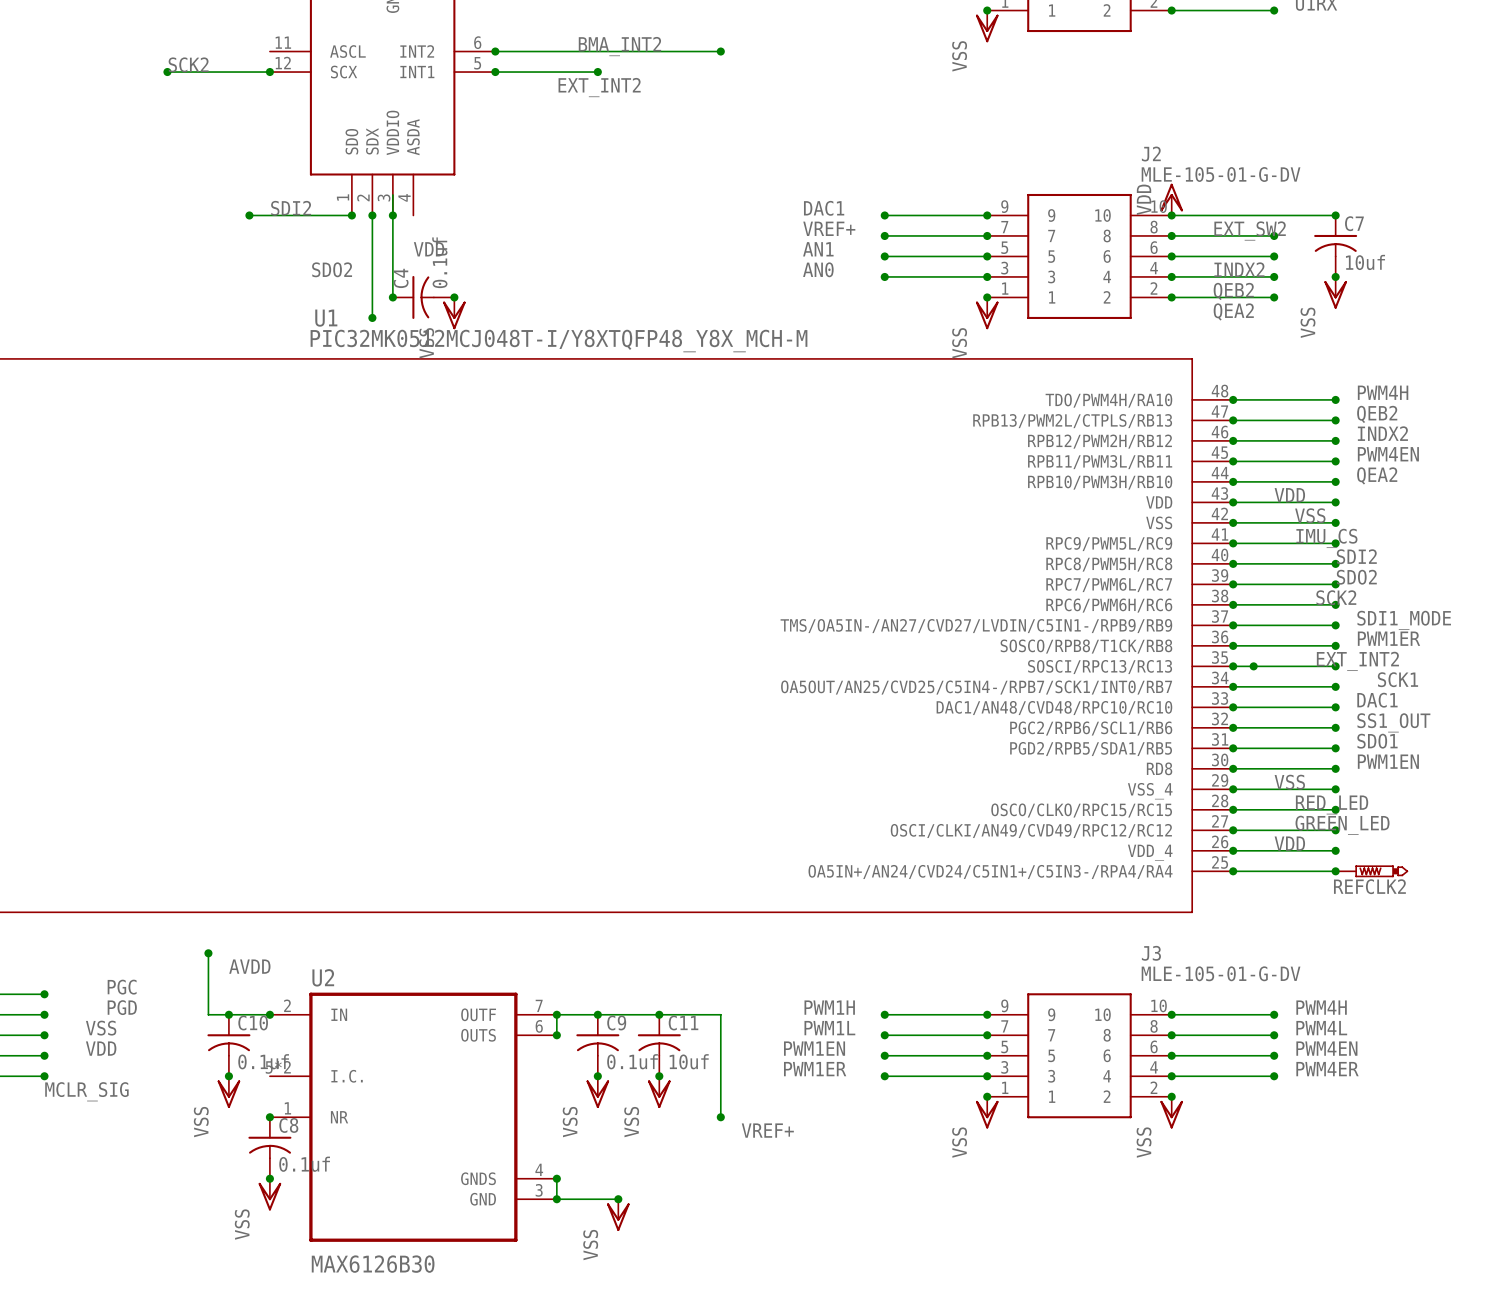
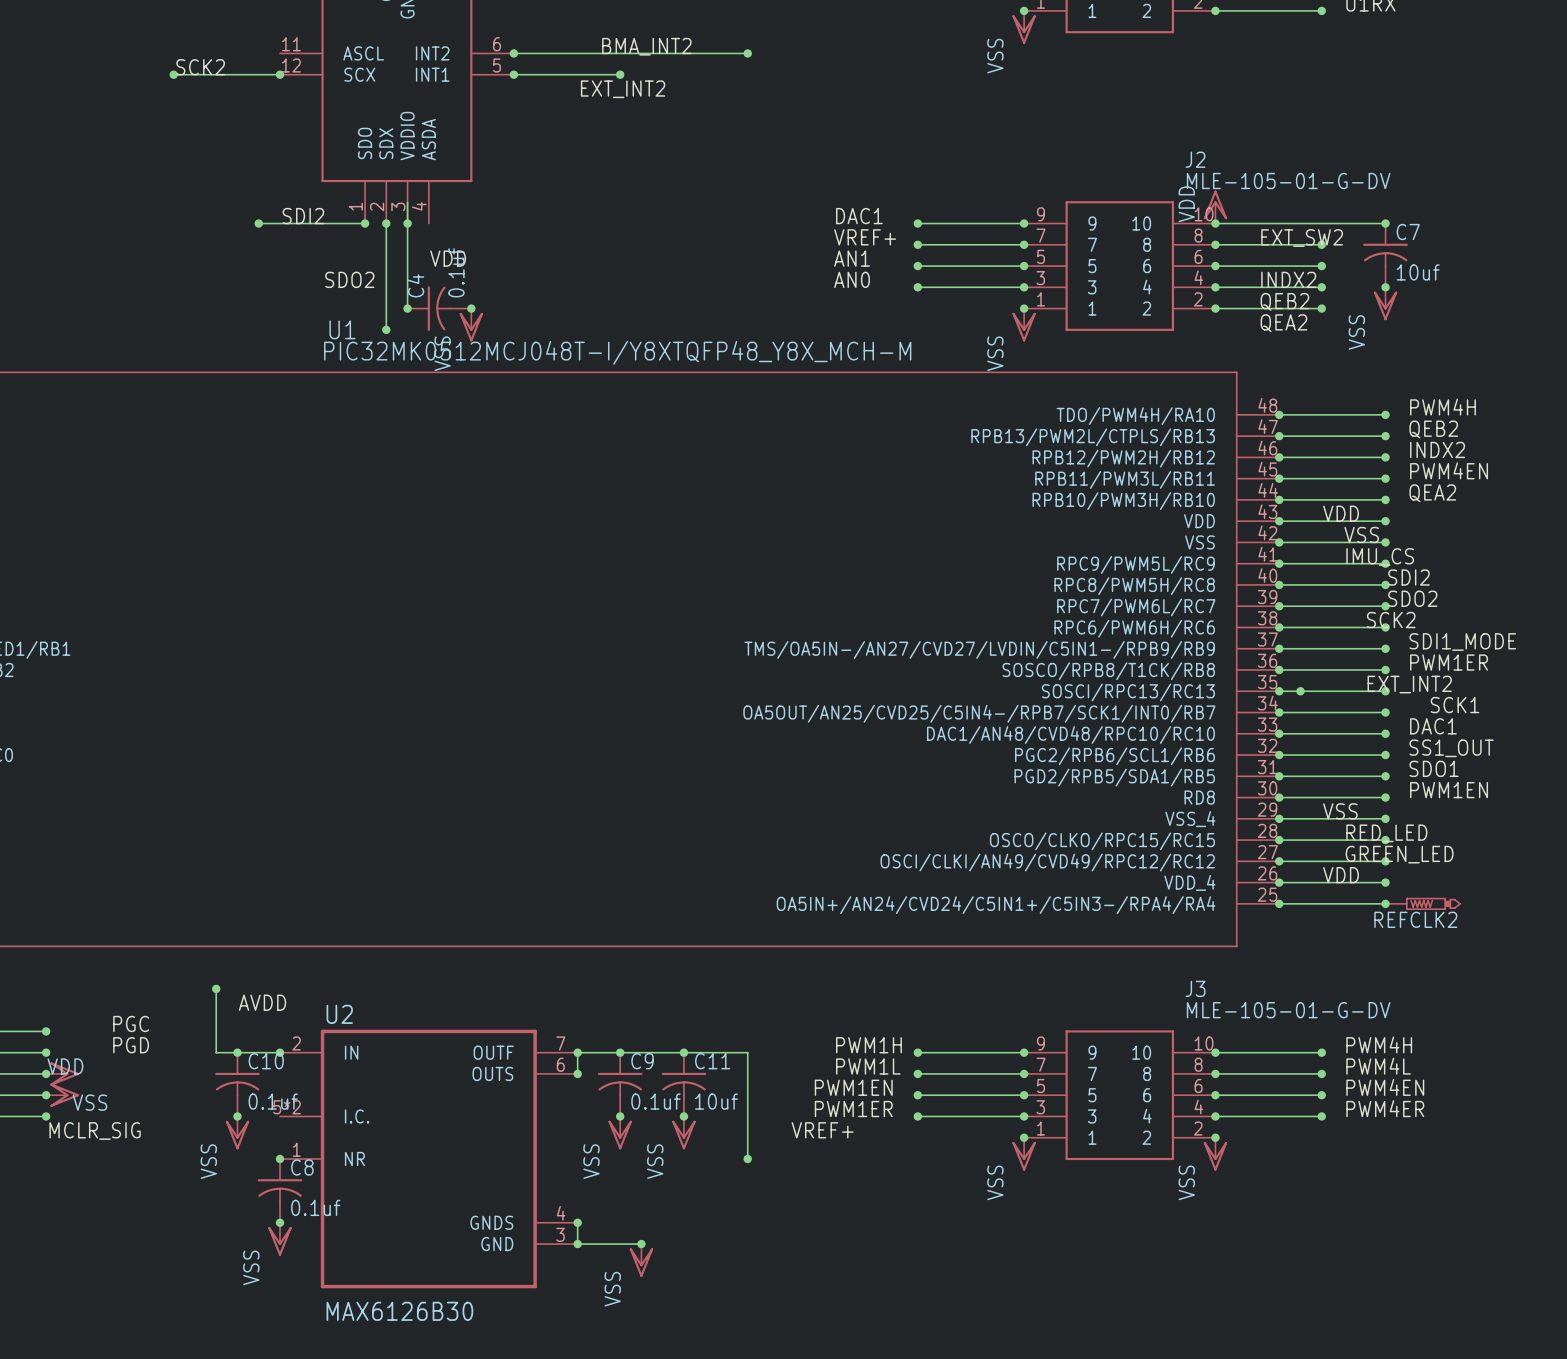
label: VSS (101, 1028) -> none
power symbol: none -> VSS (62, 1073)
label: VDD (101, 1048) -> none
power symbol: none -> VDD (62, 1095)
label position: VREF+ (767, 1130) -> VREF+ (822, 1130)

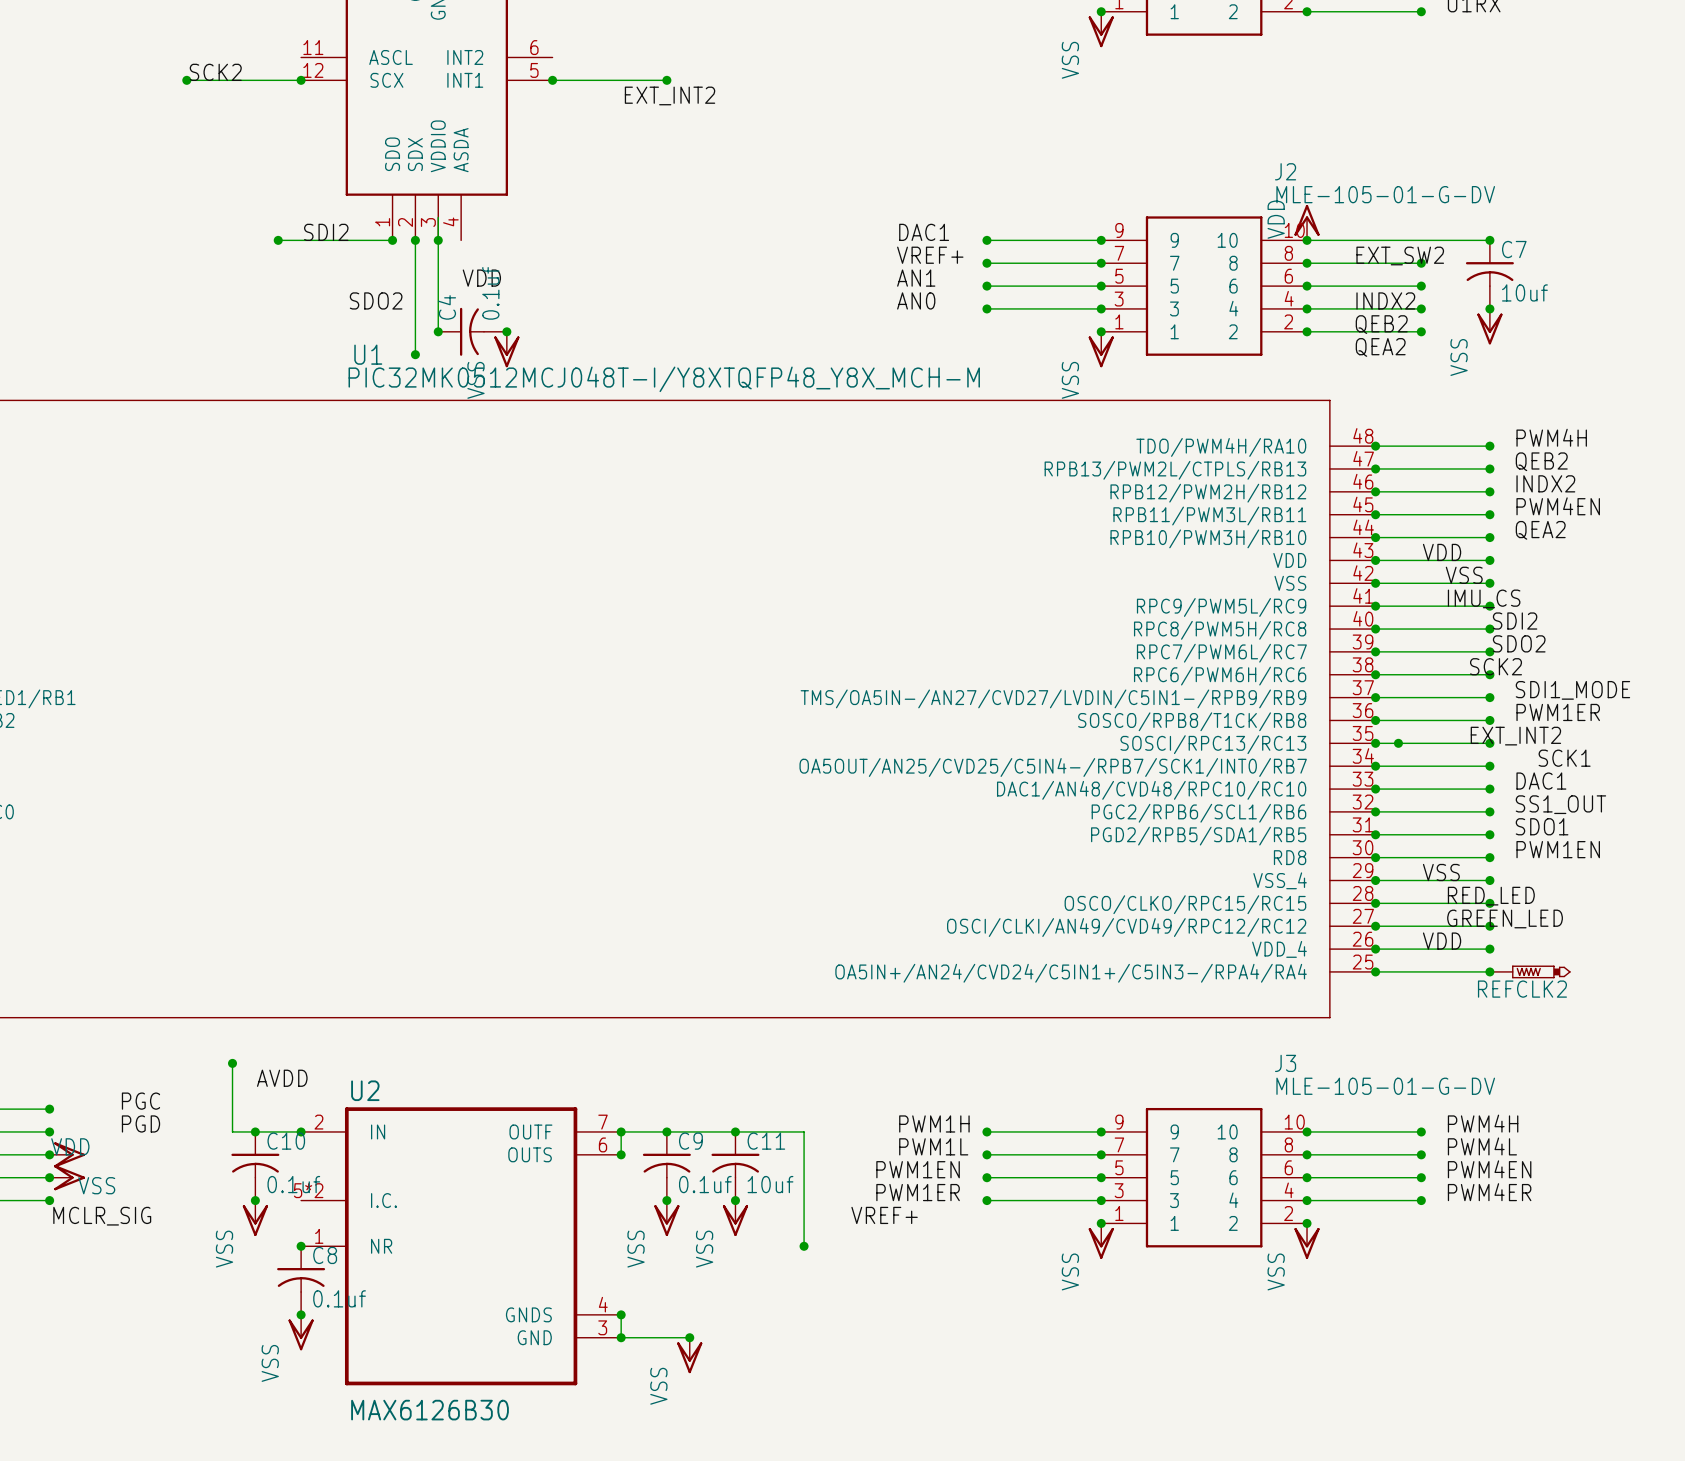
label: BMA_INT2 (646, 46) -> none
wire: (513, 53) (747, 53) -> none
junction: (513, 53) -> none
junction: (747, 53) -> none

